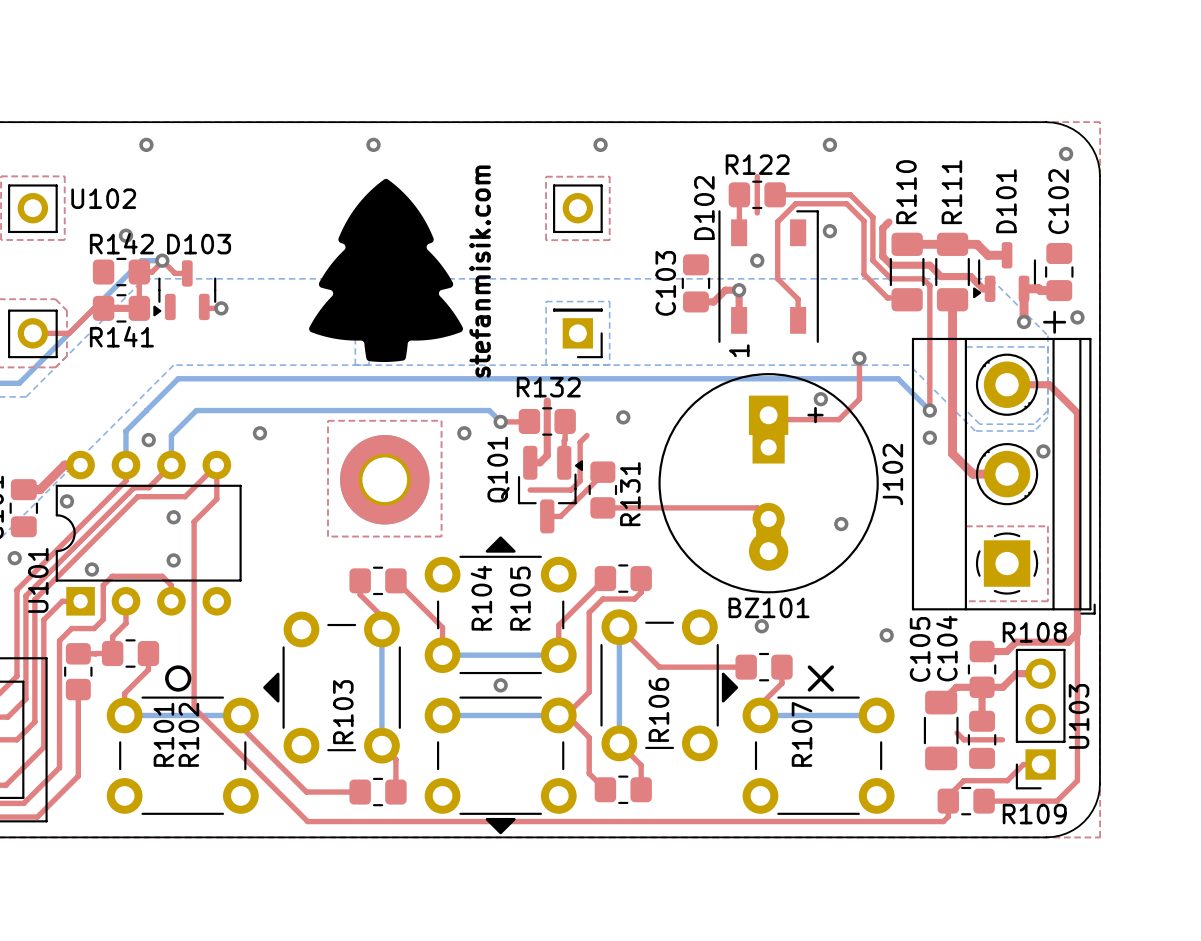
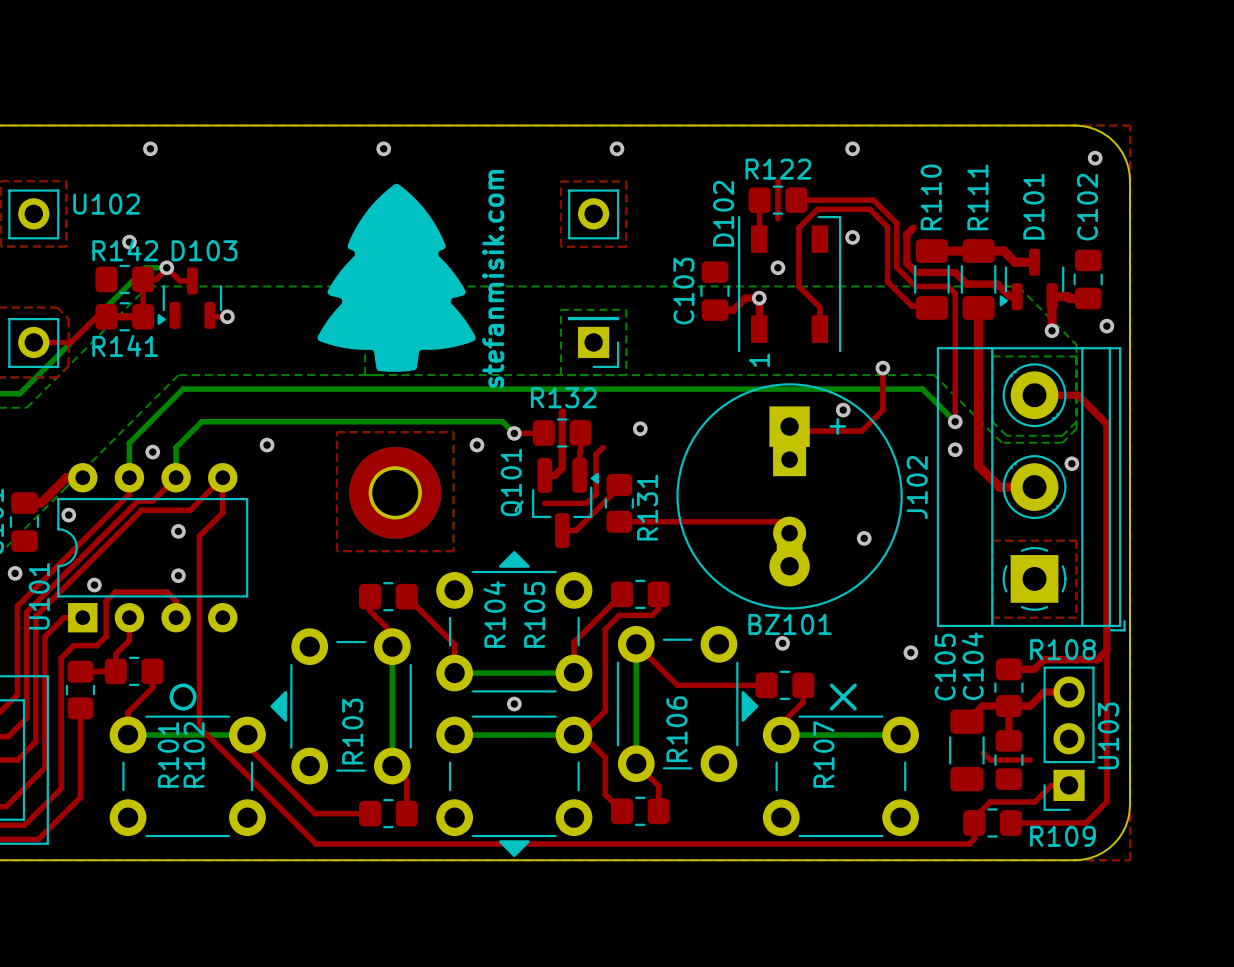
text: + (1054, 322) -> none

